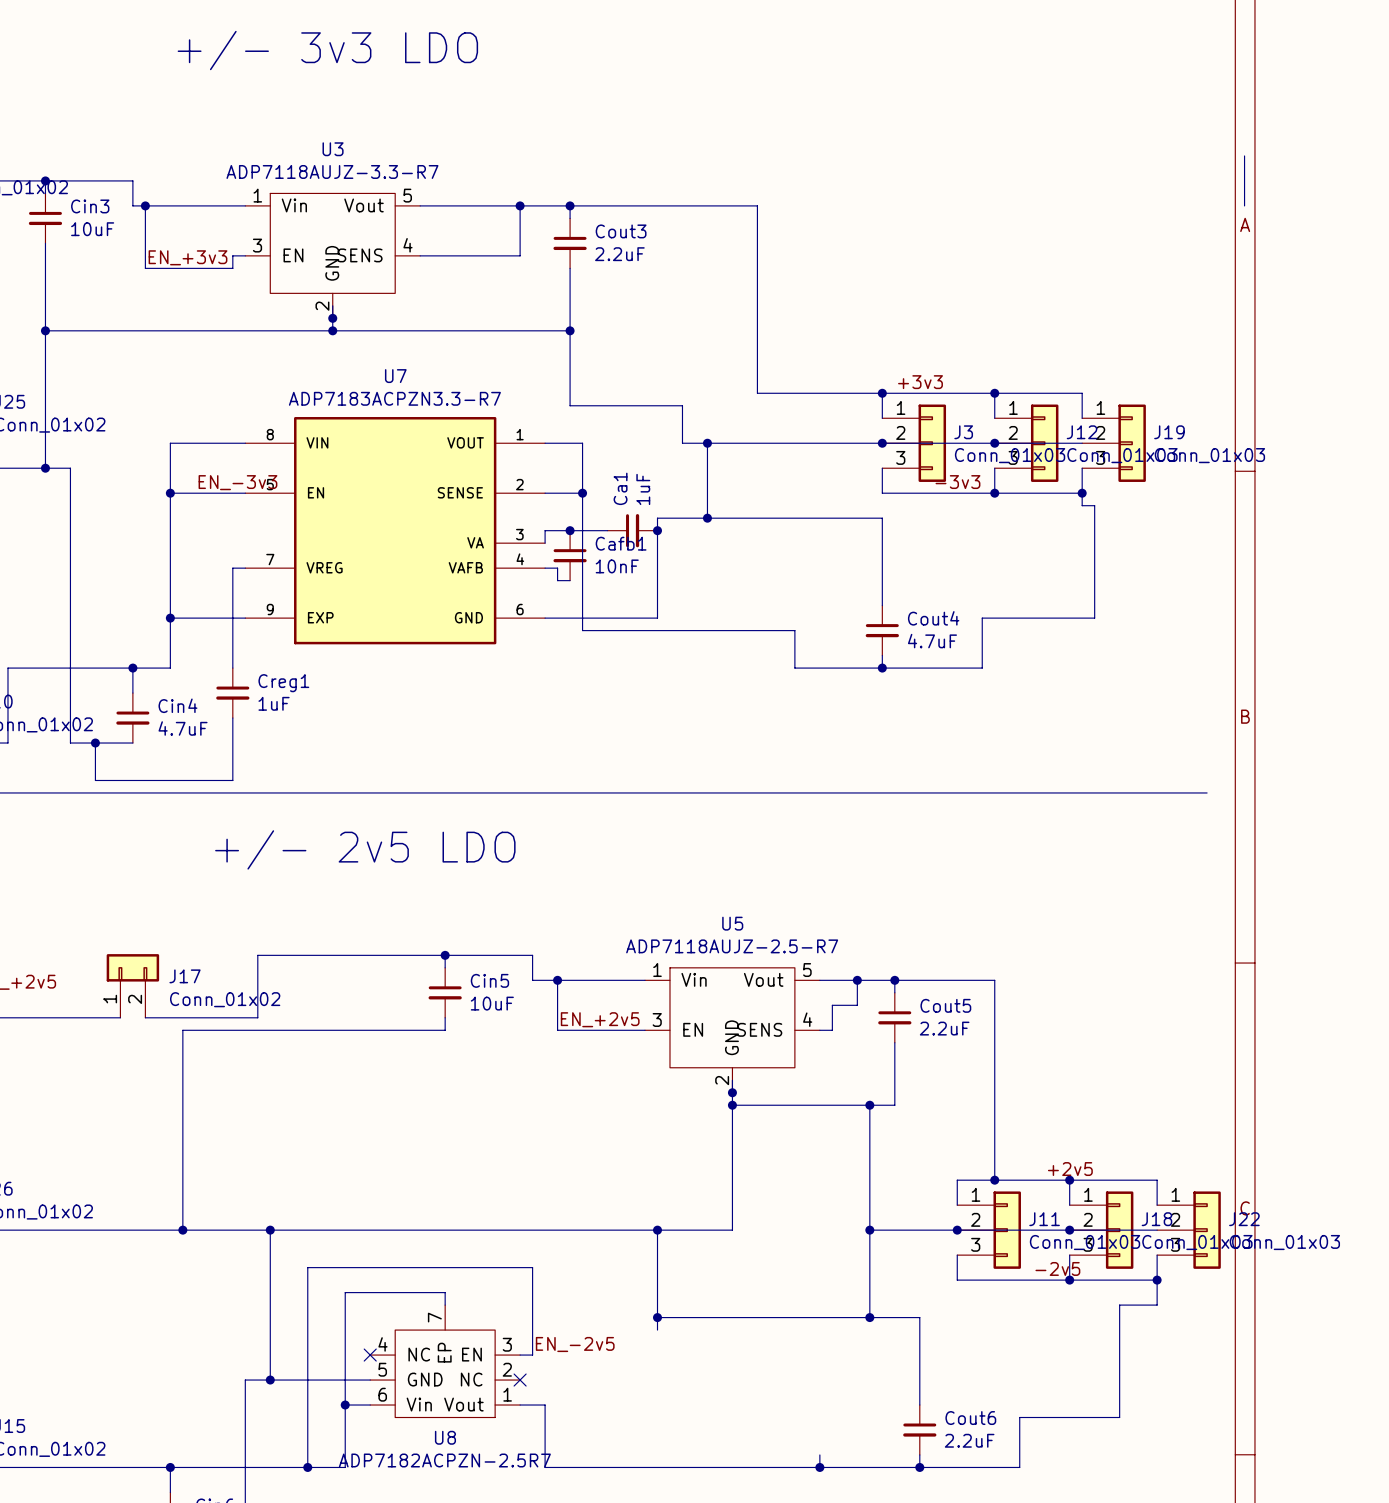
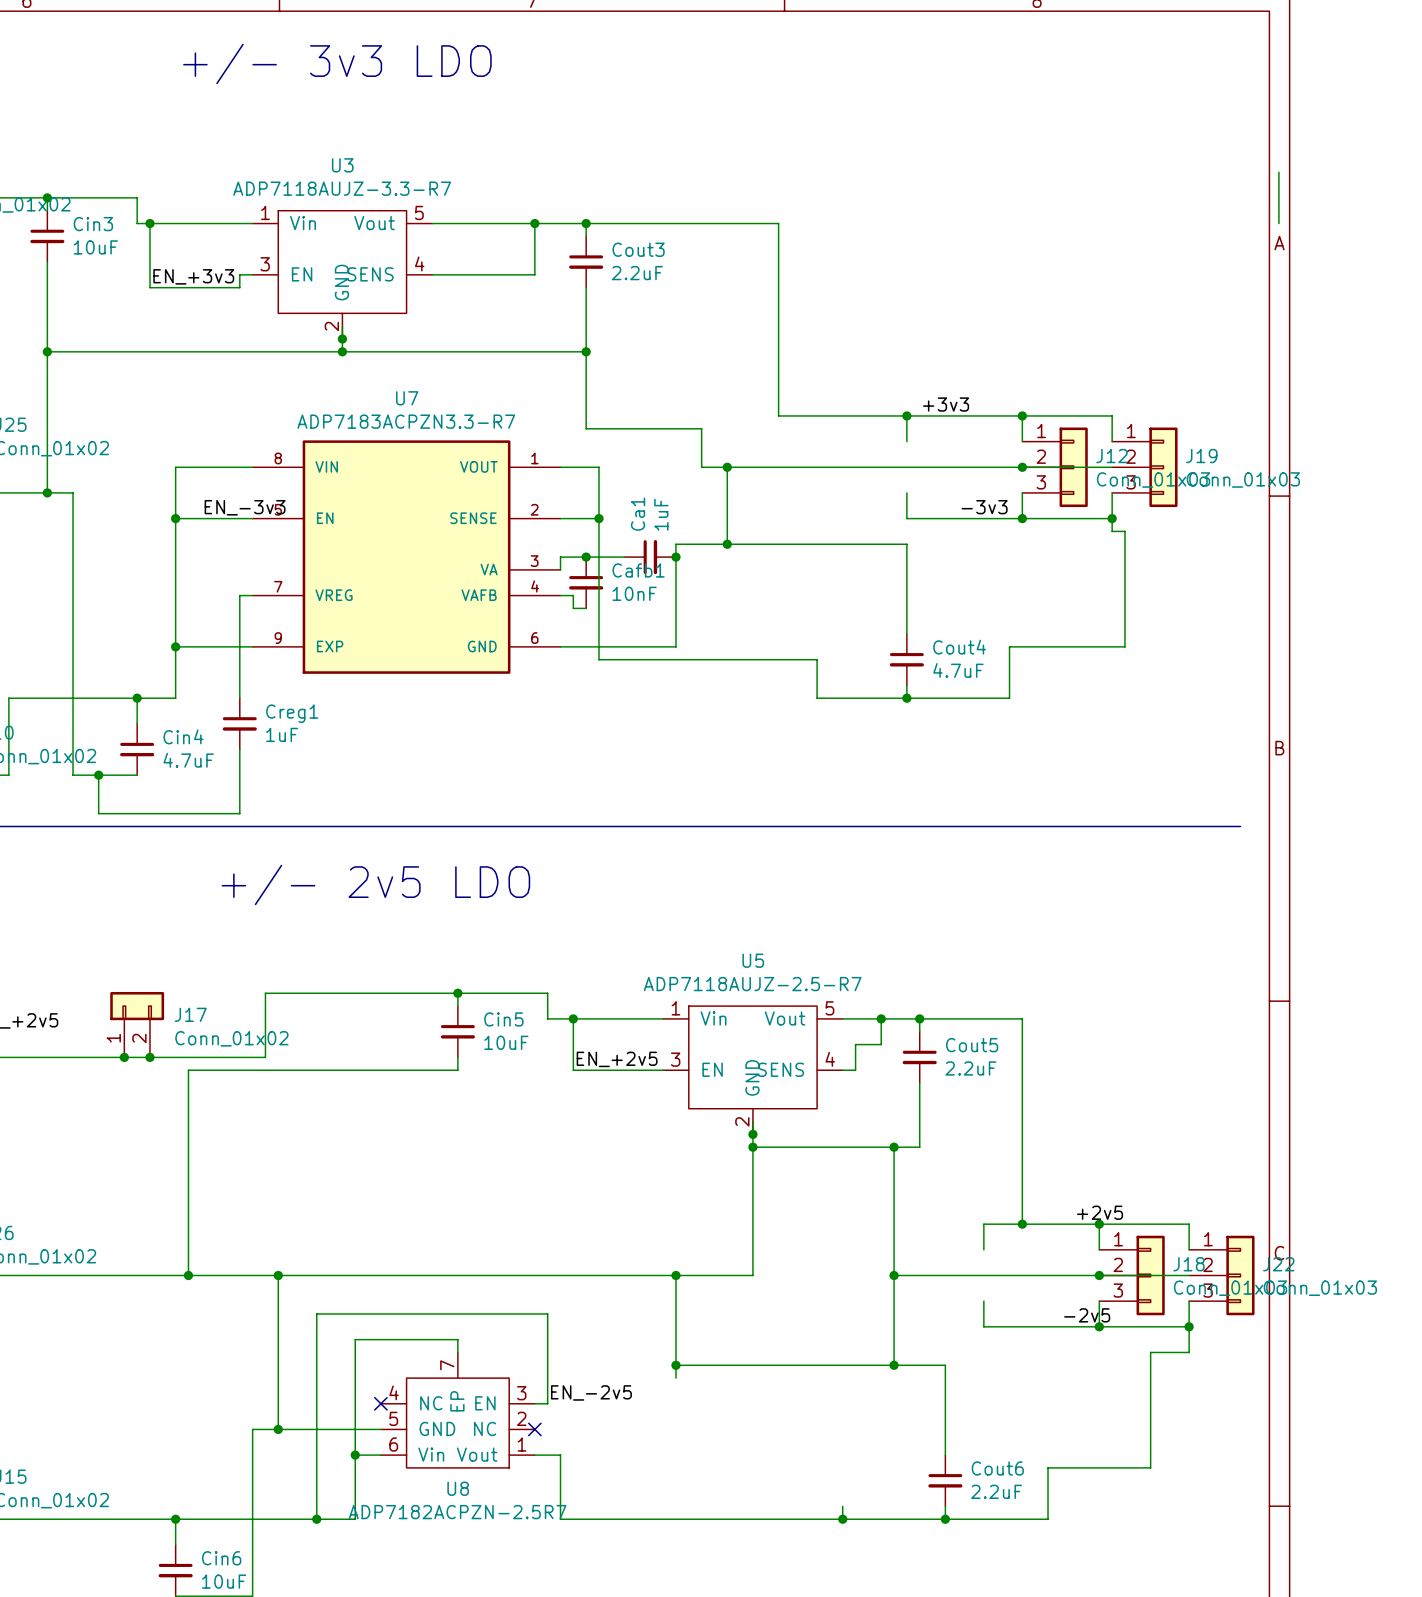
junction: (882, 443) -> none
J3: Conn_01x03 (914, 443) -> none
wire: none -> (124, 1057) (149, 1057)
junction: none -> (124, 1057)
junction: none -> (149, 1057)
junction: (957, 1230) -> none
J11: Conn_01x03 (989, 1230) -> none

